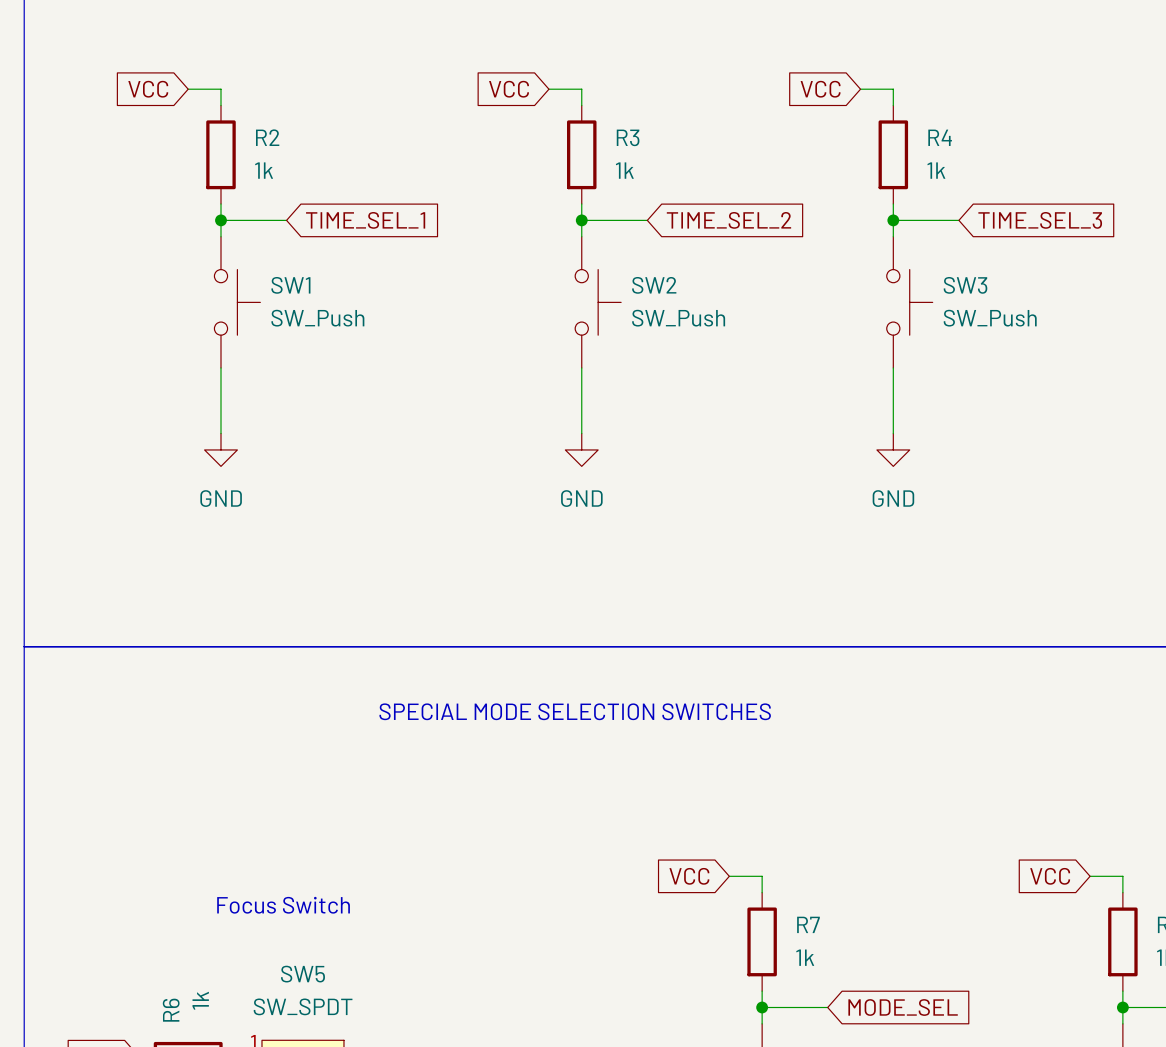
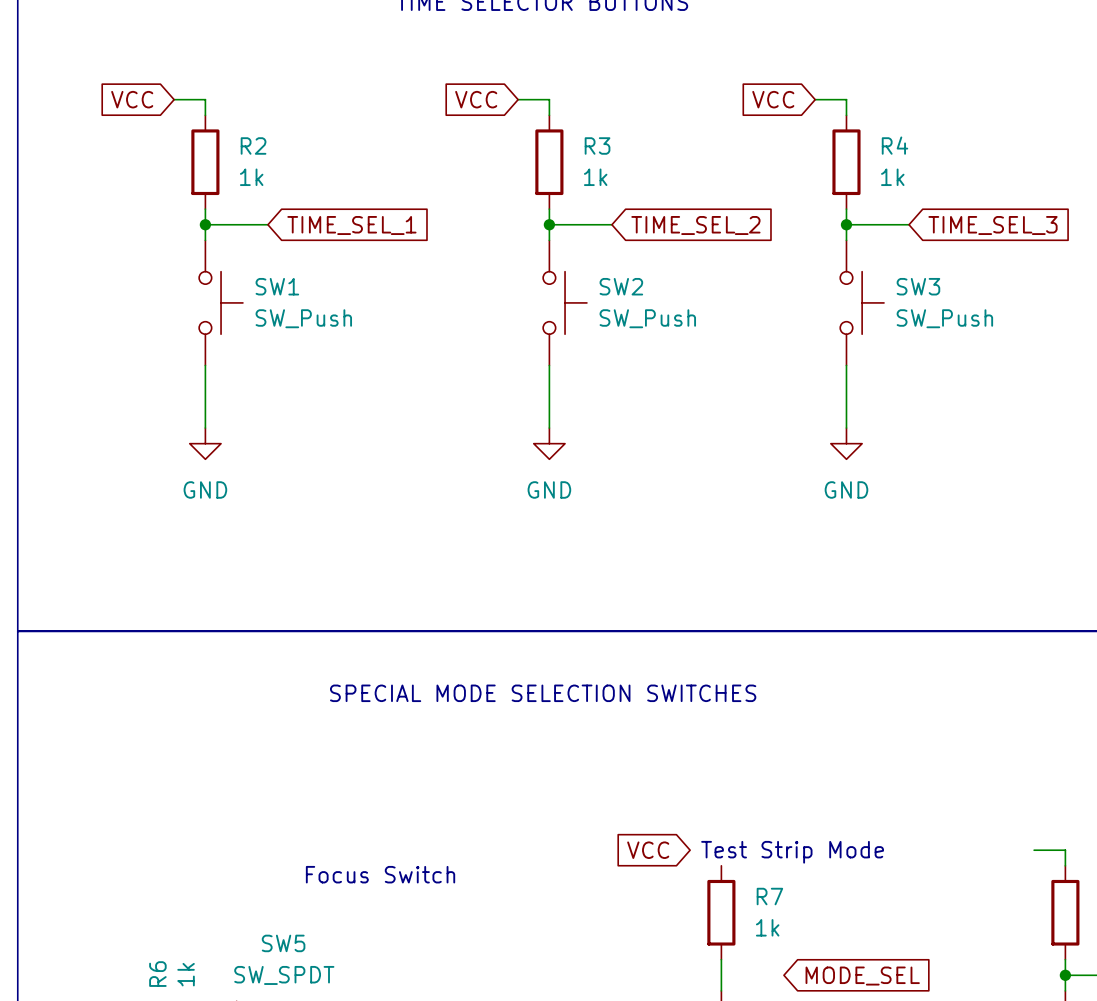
wire: (729, 876) (762, 876) (762, 892) -> none
global label: VCC (1050, 876) -> none
text: none -> Test Strip Mode (792, 852)
text position: Focus Switch (283, 905) -> Focus Switch (380, 874)
wire: (762, 1007) (827, 1007) -> none
junction: (762, 1007) -> none

